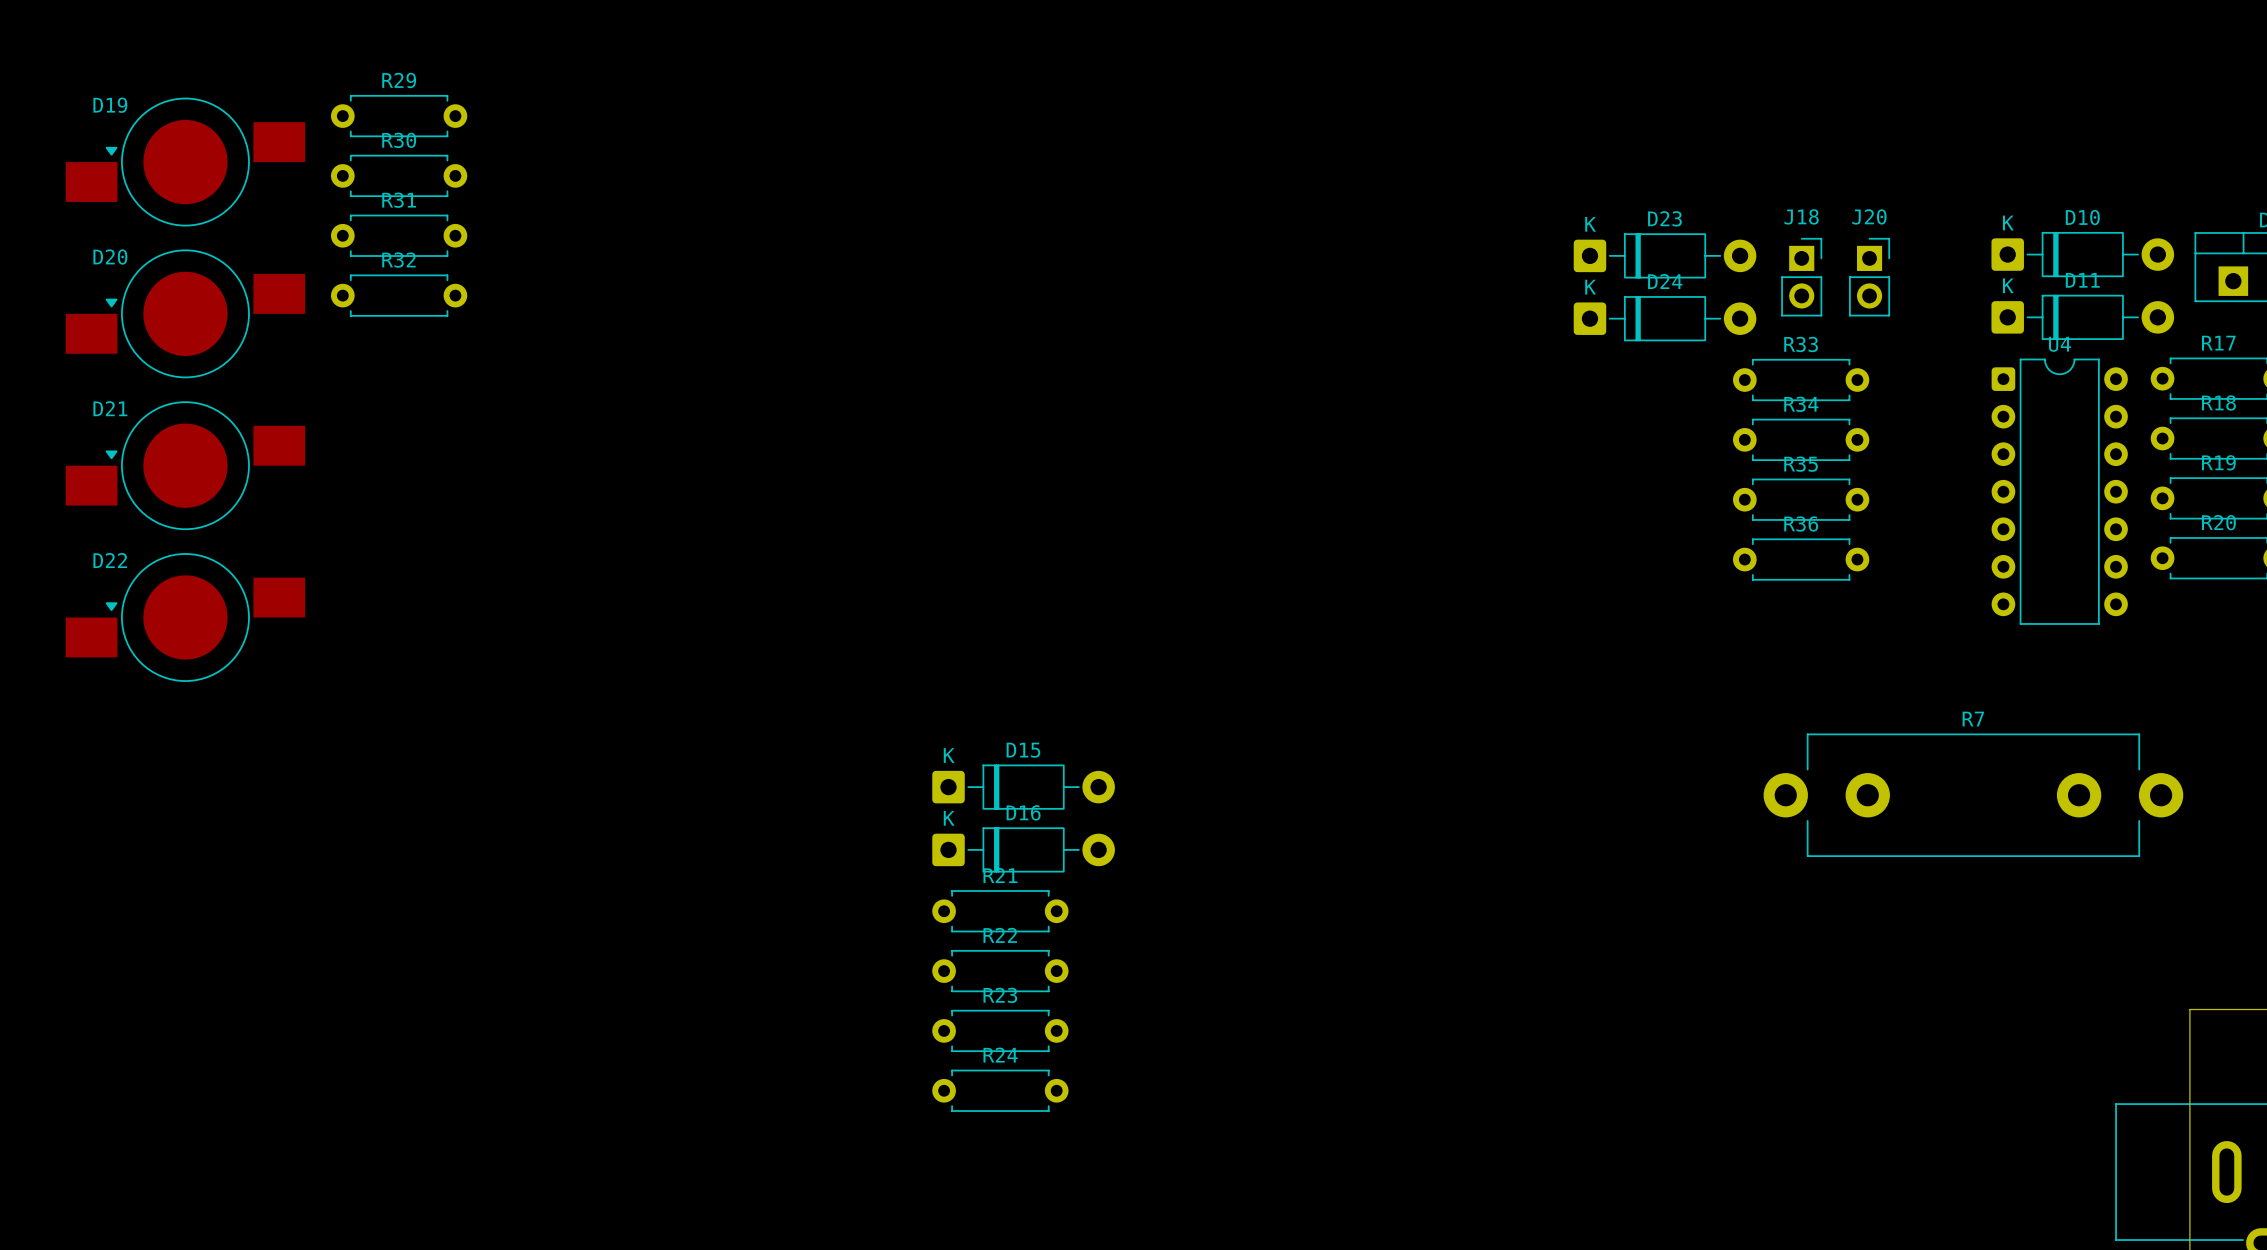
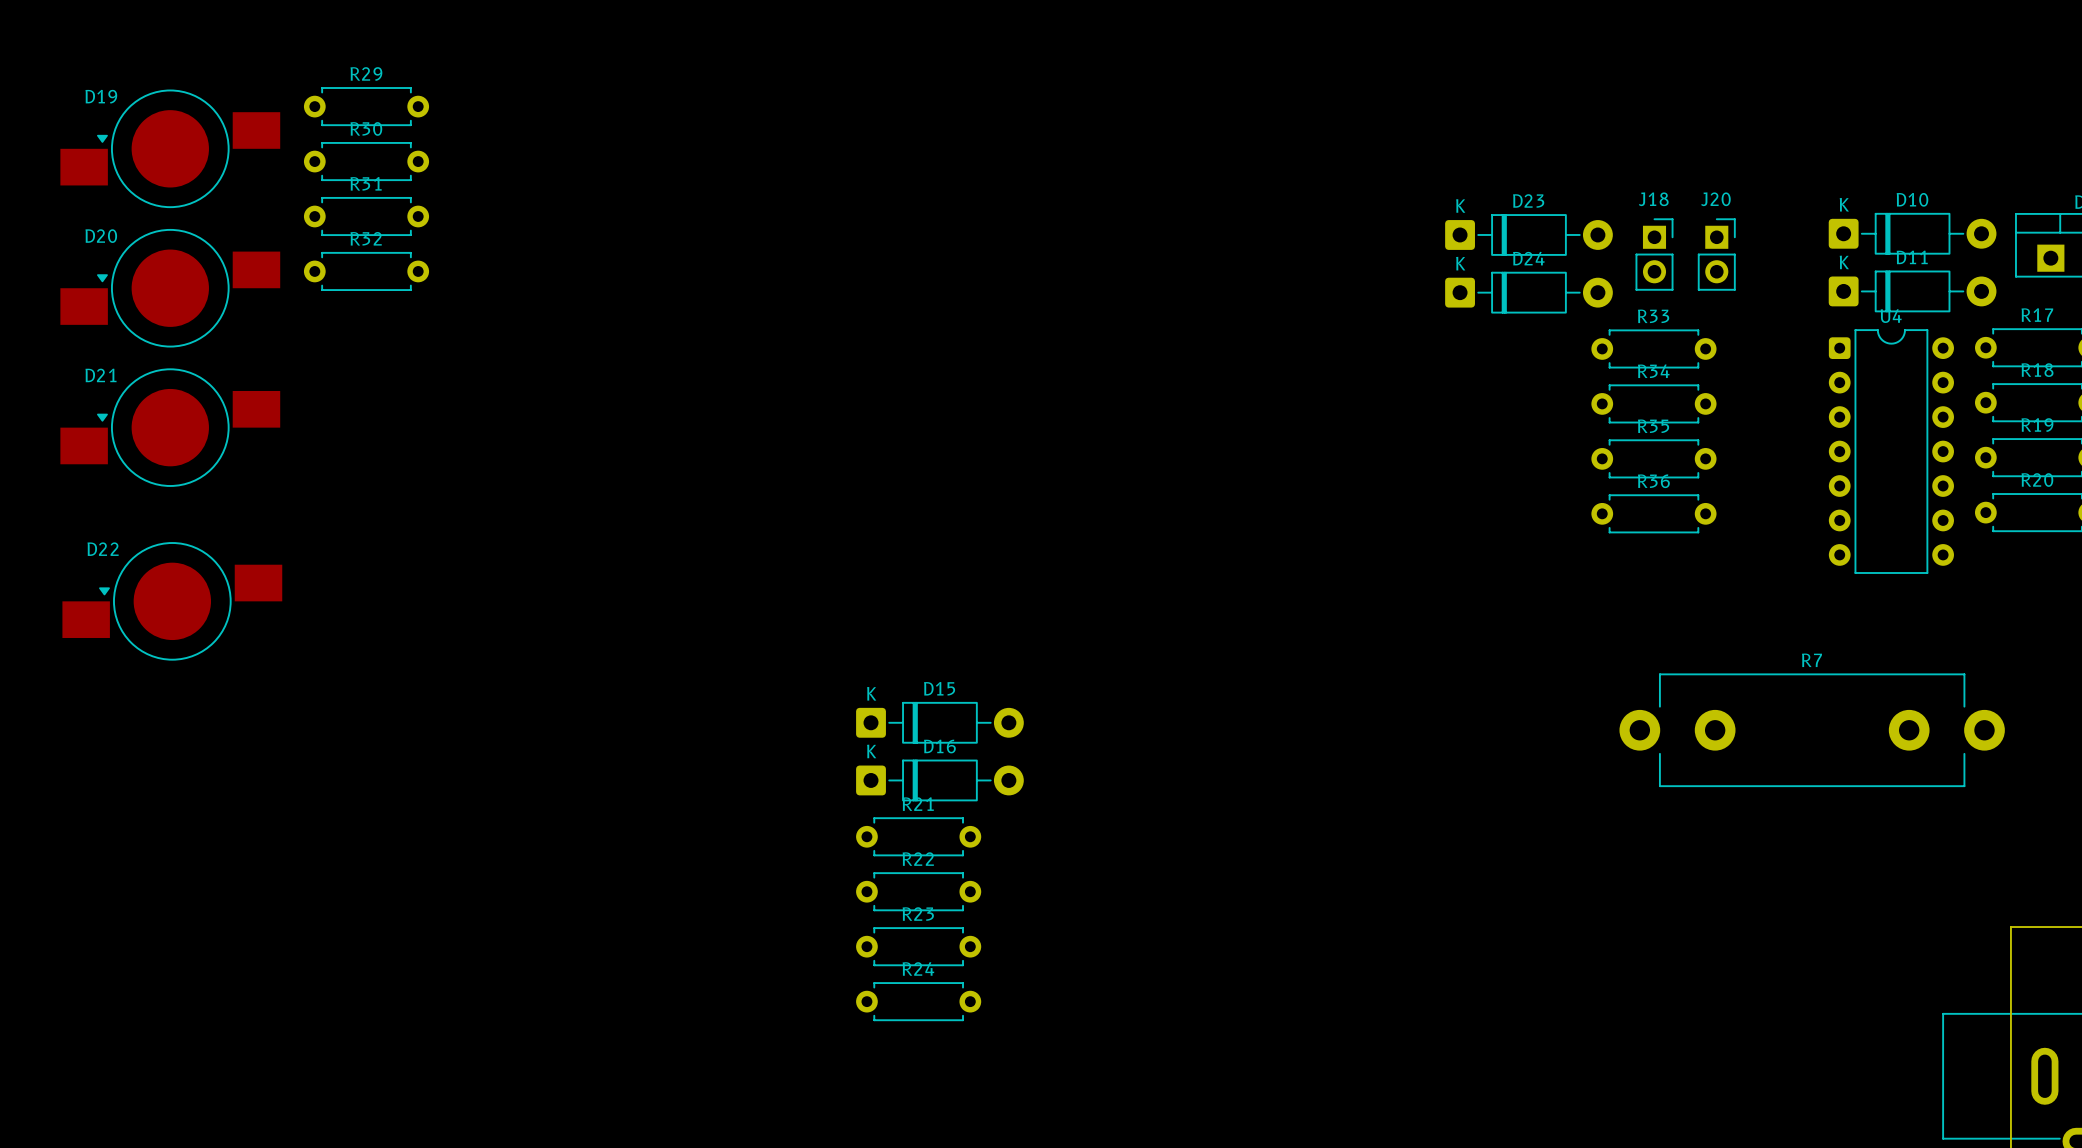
D22 position: (185, 617) -> (172, 601)

